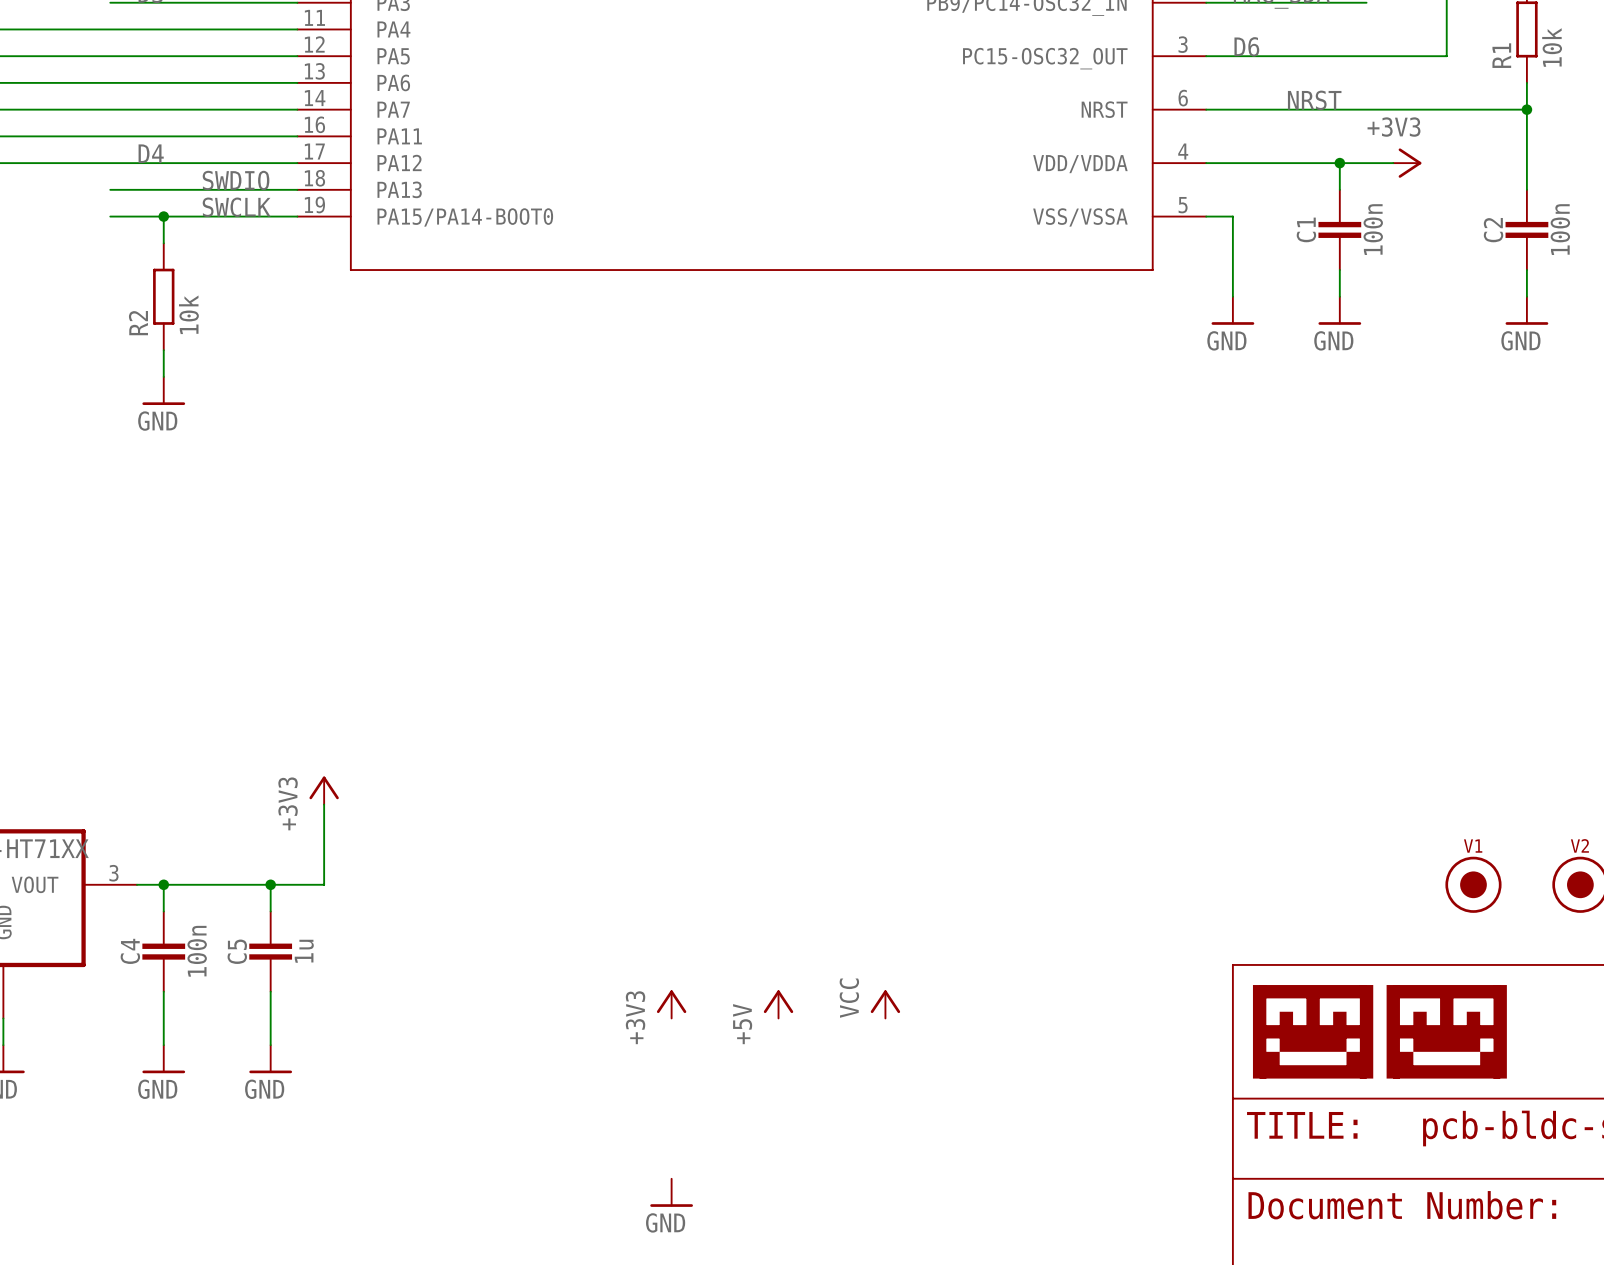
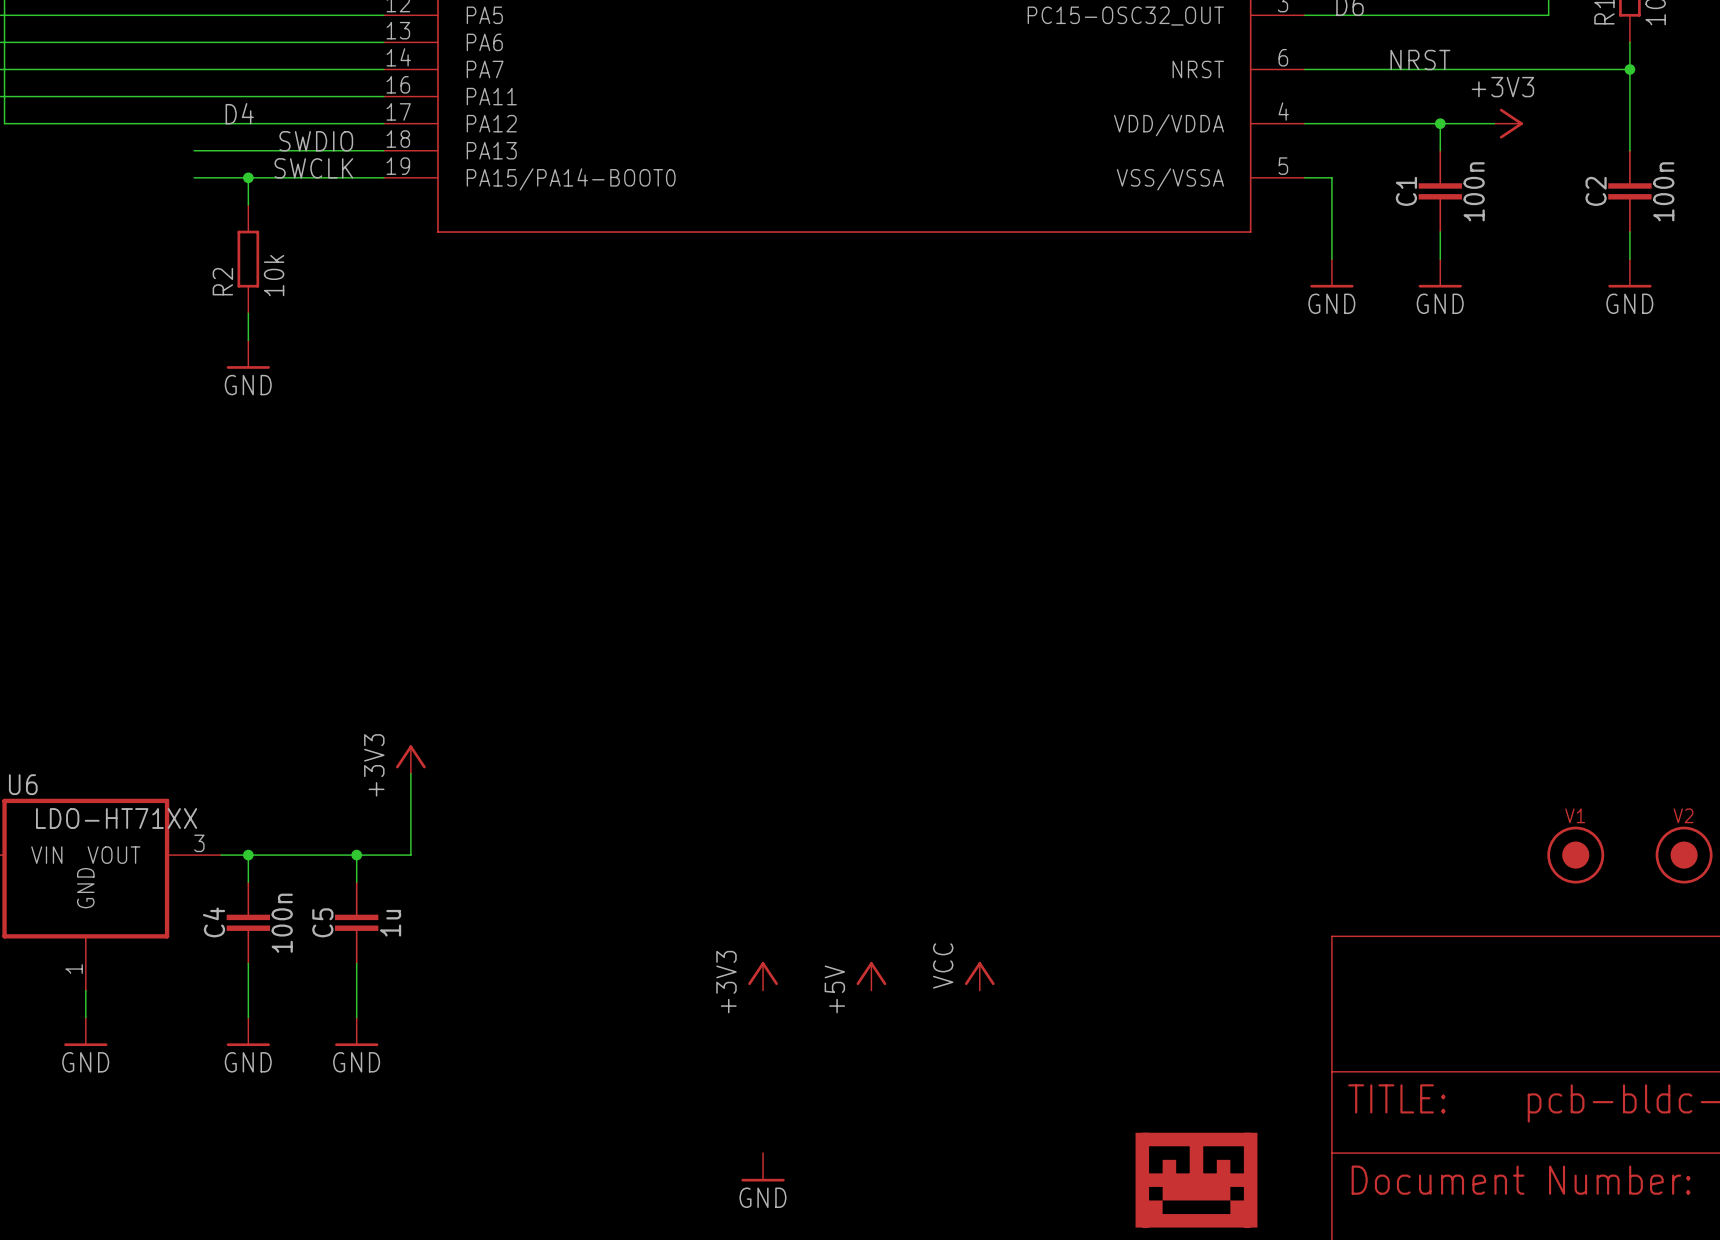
part: (1313, 1031) -> none
part: (1446, 1031) -> none
part: none -> (1196, 1180)

